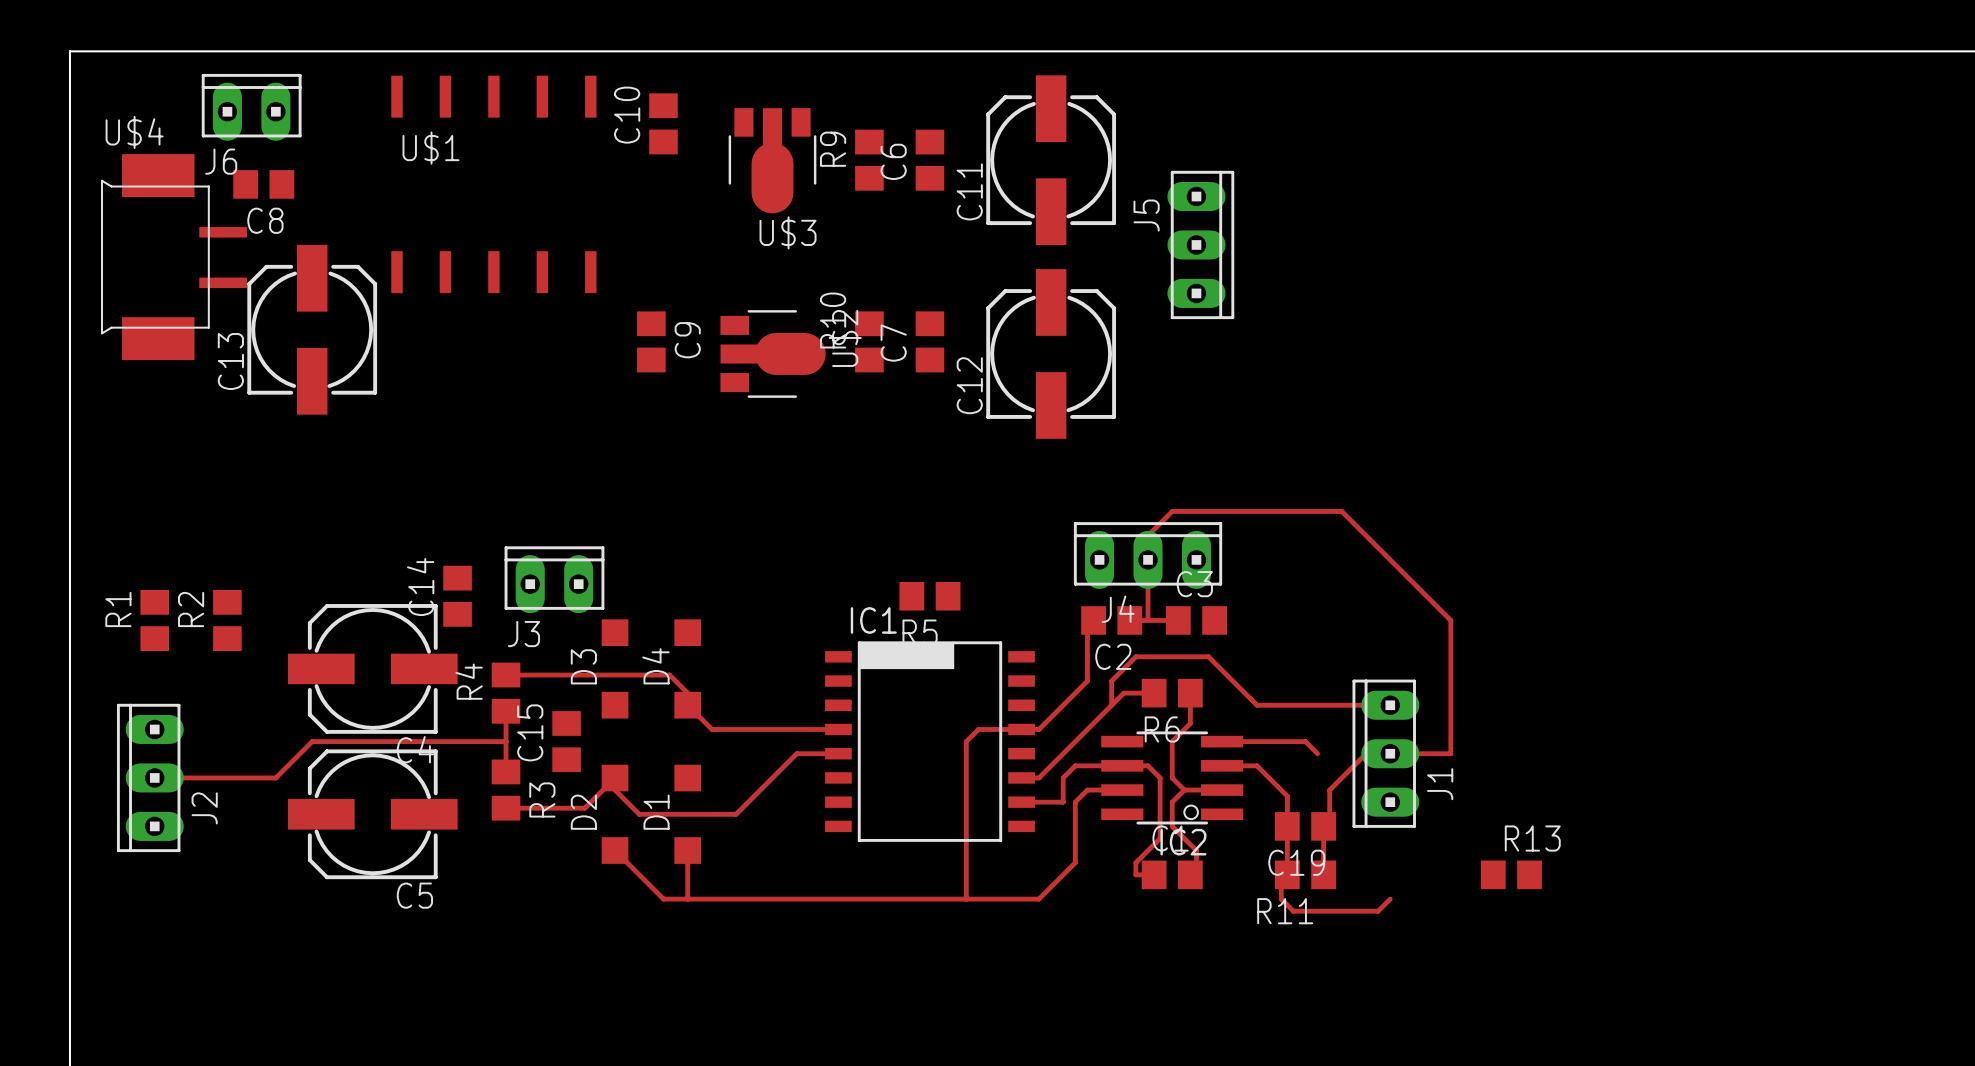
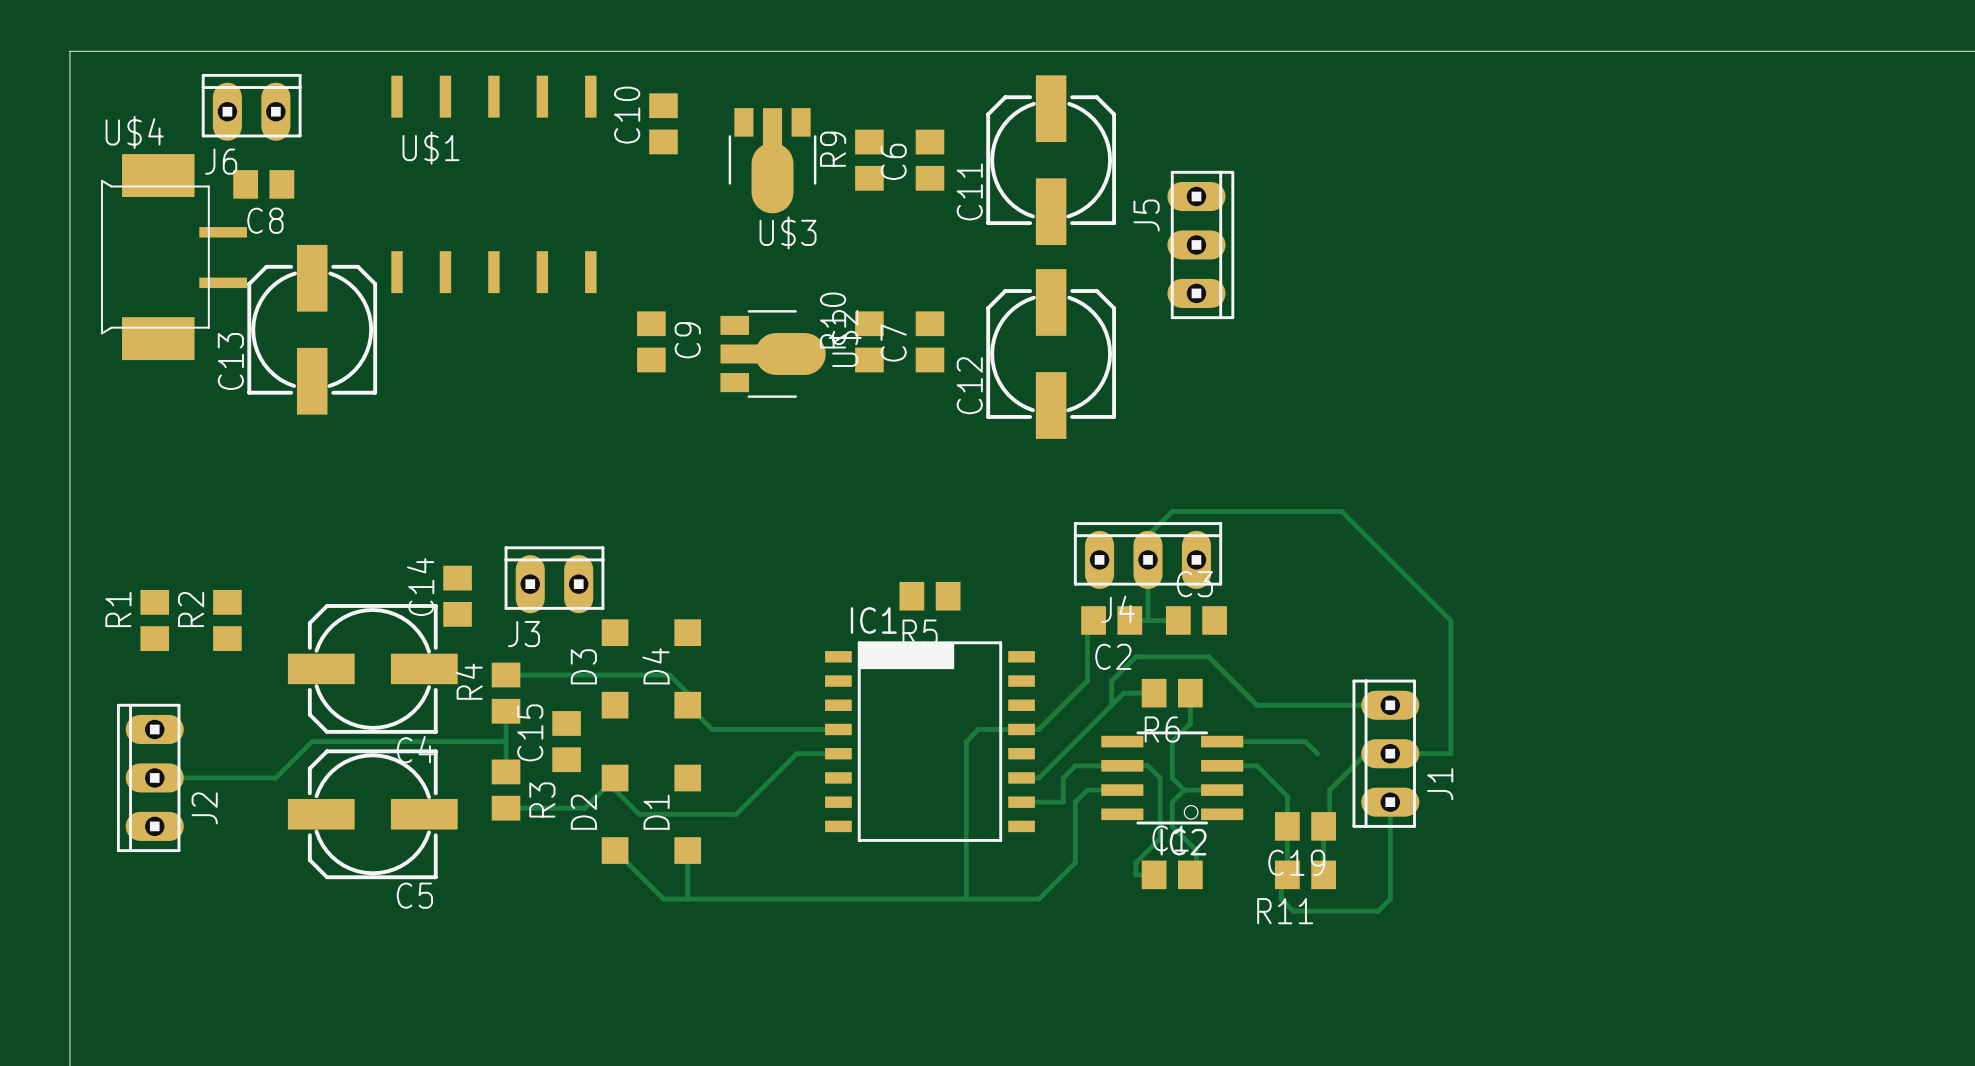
track: none -> (1390, 802) (1390, 899)
R13: (1511, 874) -> none

